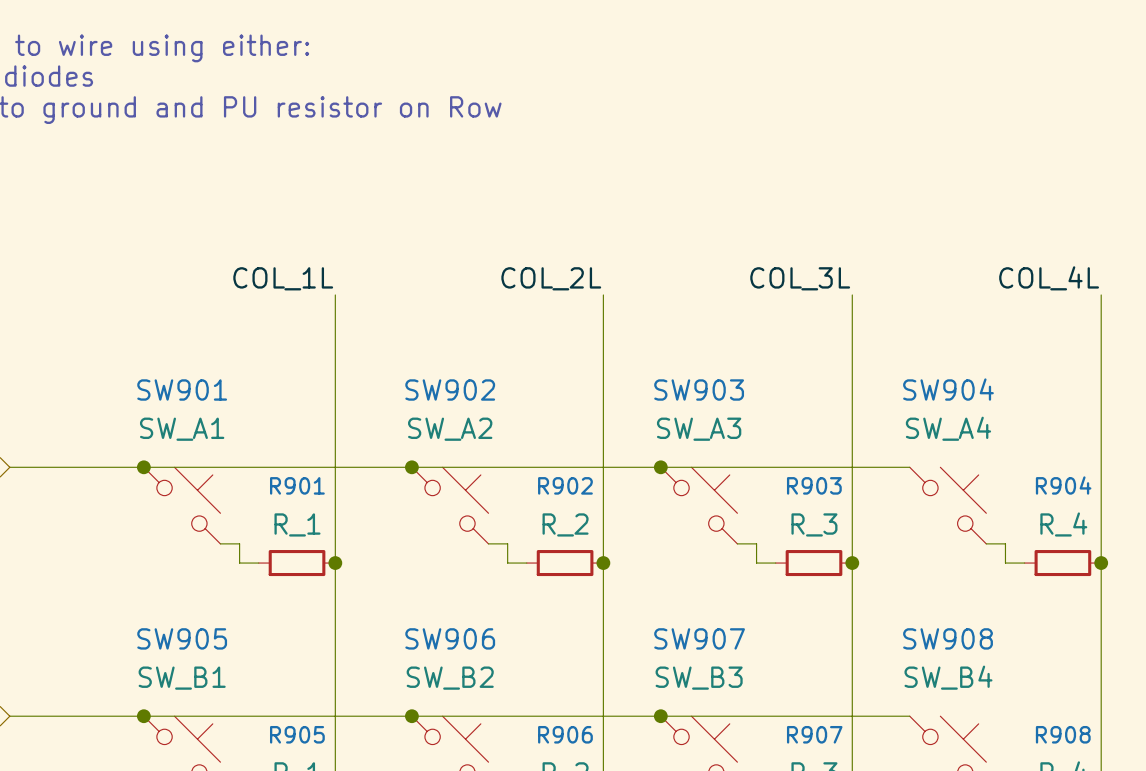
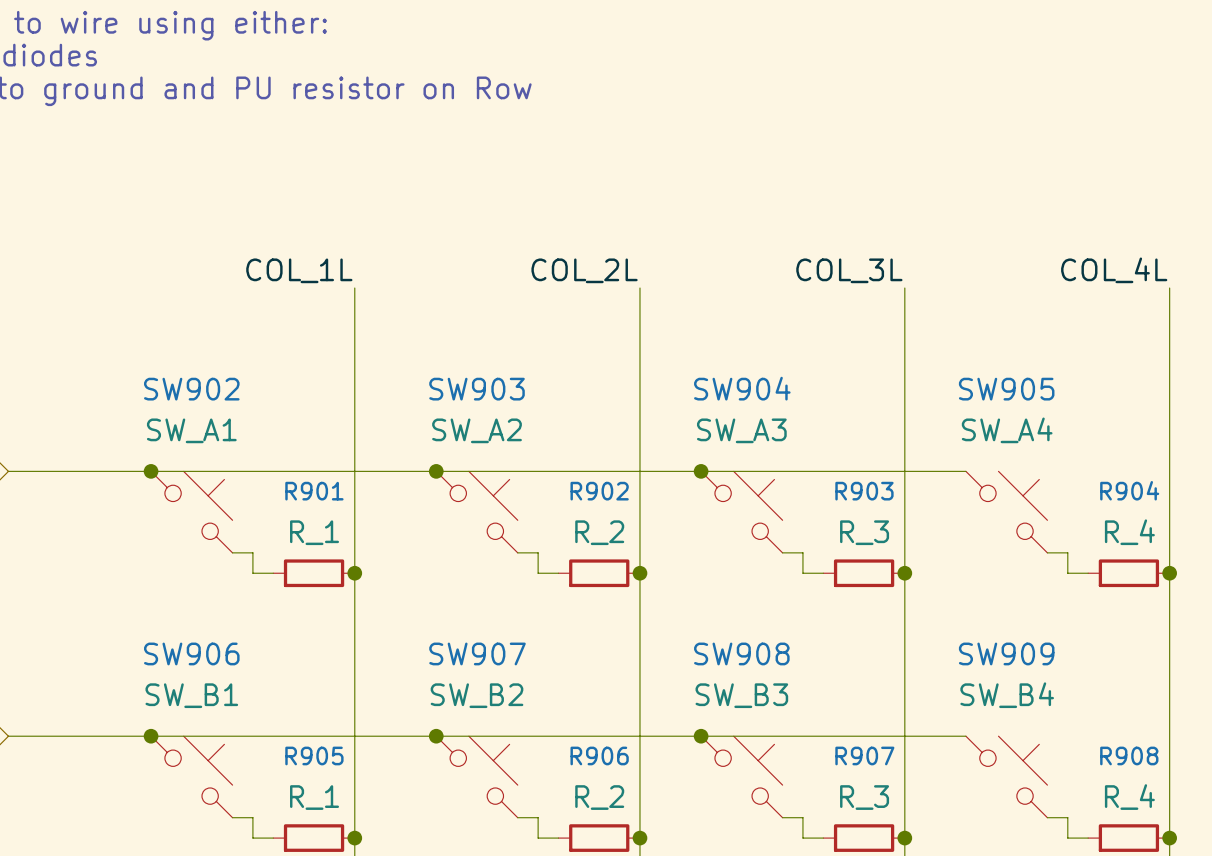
SW904 name: SW904 (948, 389) -> SW905 (1006, 389)
SW901 name: SW901 (182, 390) -> SW902 (191, 389)
SW902 name: SW902 (450, 390) -> SW903 (477, 389)
SW903 name: SW903 (699, 390) -> SW904 (742, 388)
SW905 name: SW905 (182, 638) -> SW906 (191, 653)
SW906 name: SW906 (450, 638) -> SW907 (477, 653)
SW907 name: SW907 (699, 638) -> SW908 (741, 653)
SW908 name: SW908 (948, 638) -> SW909 (1006, 653)

